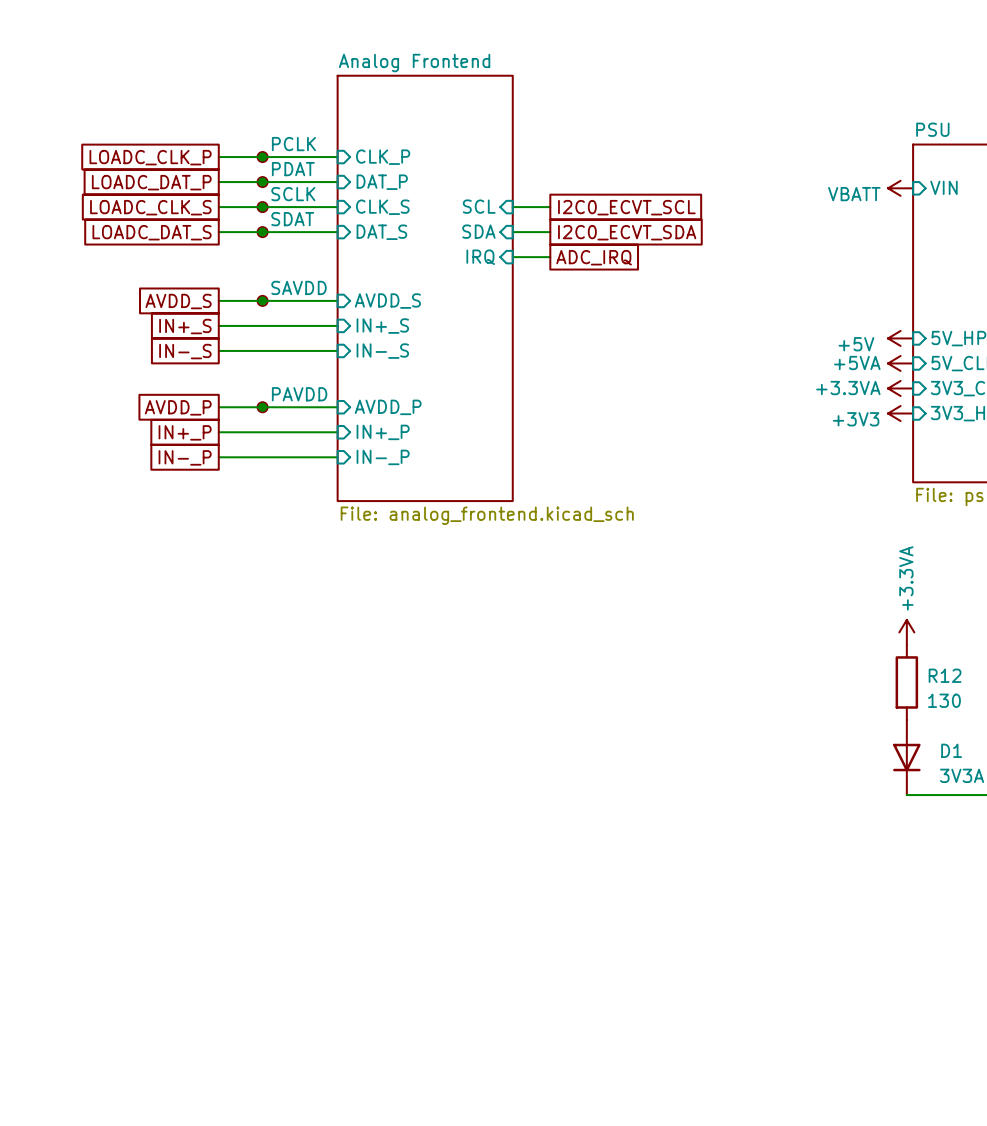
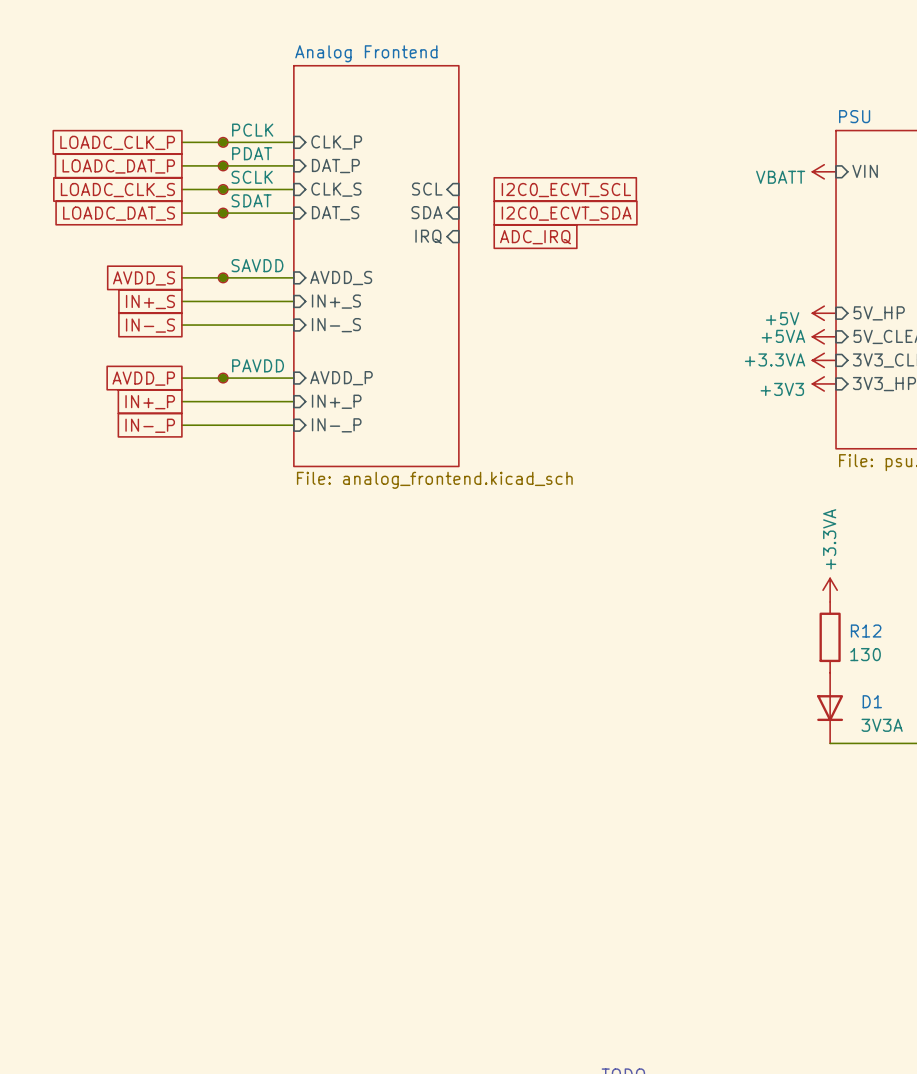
wire: (512, 207) (550, 207) -> none
wire: (512, 232) (550, 232) -> none
wire: (512, 257) (550, 257) -> none

